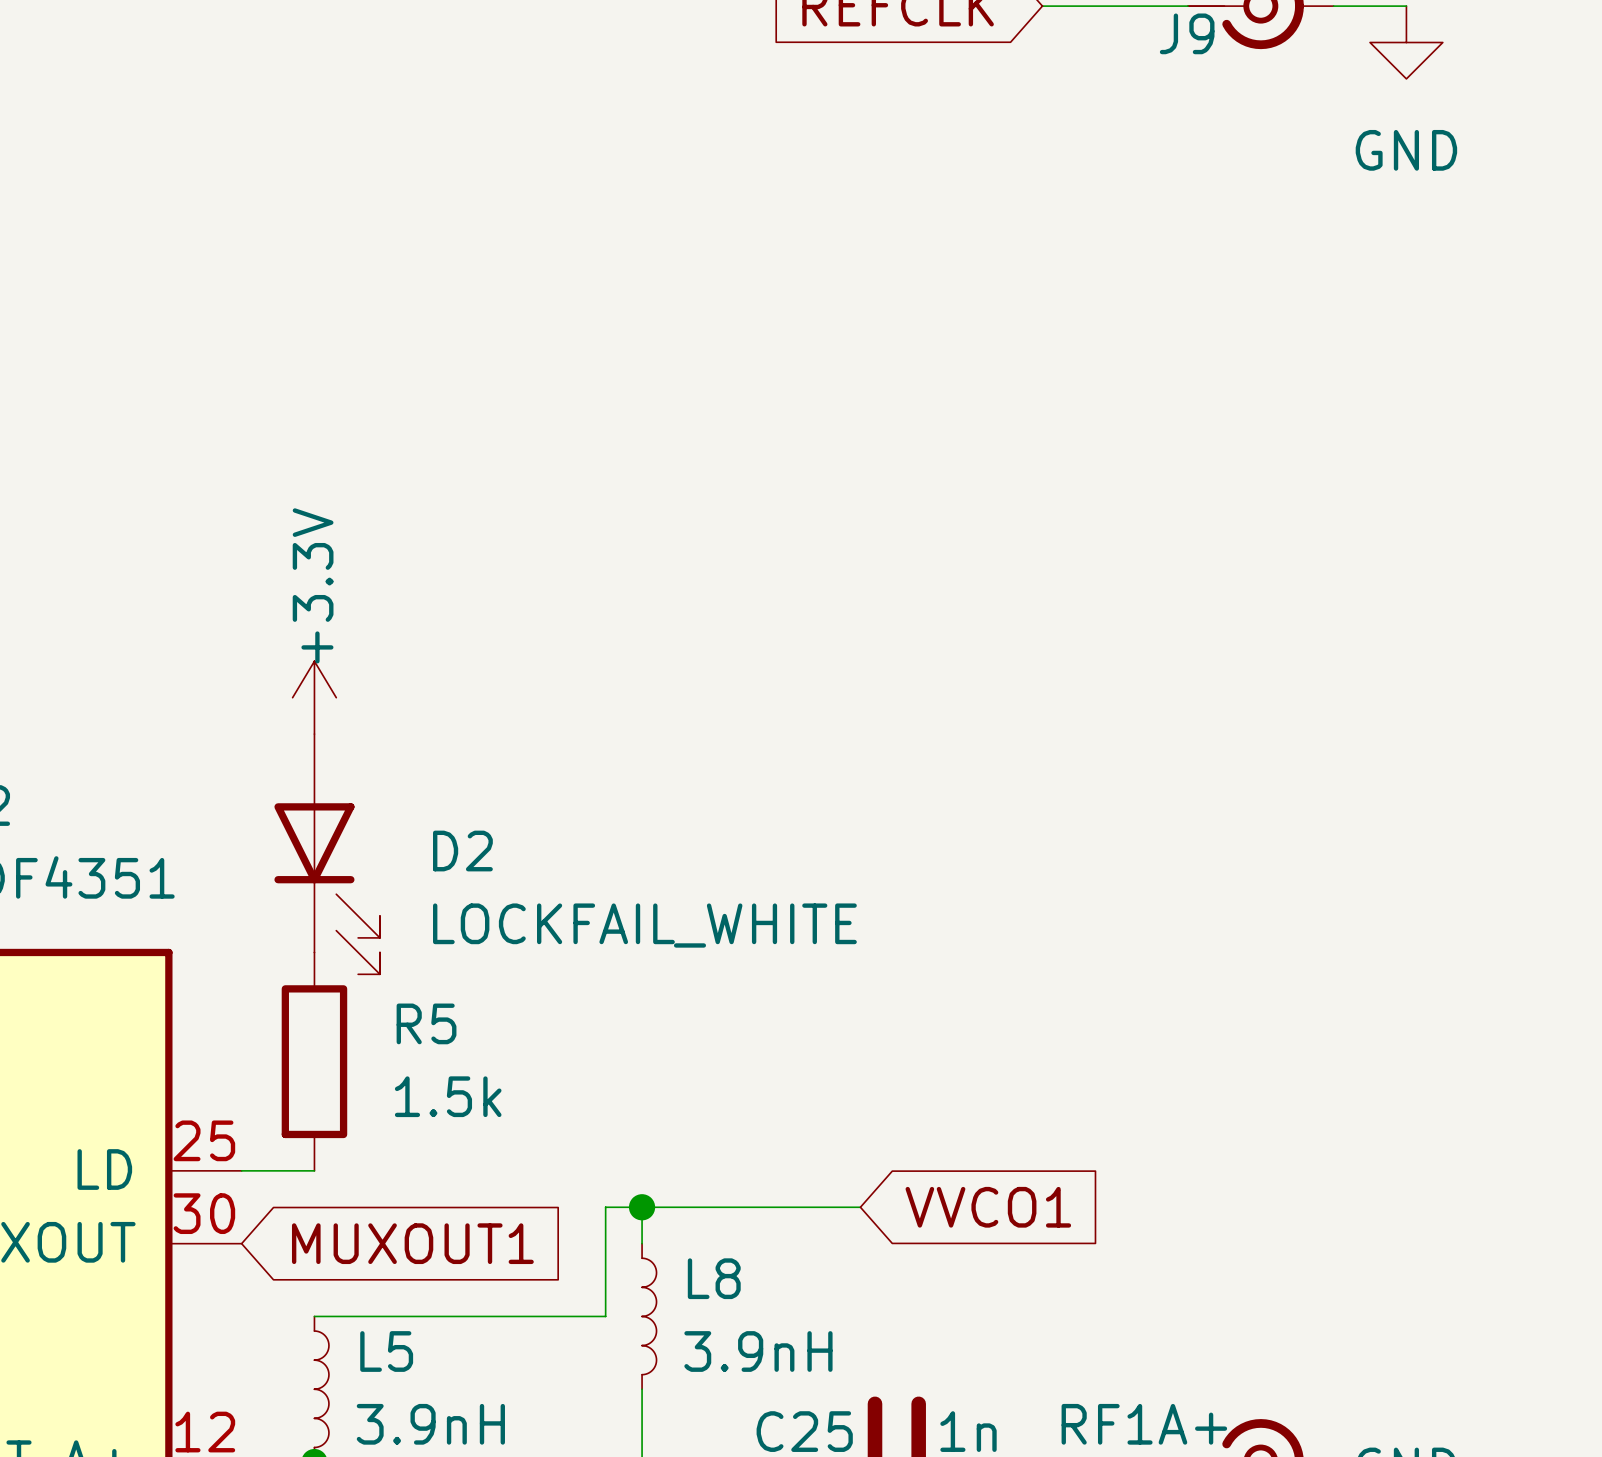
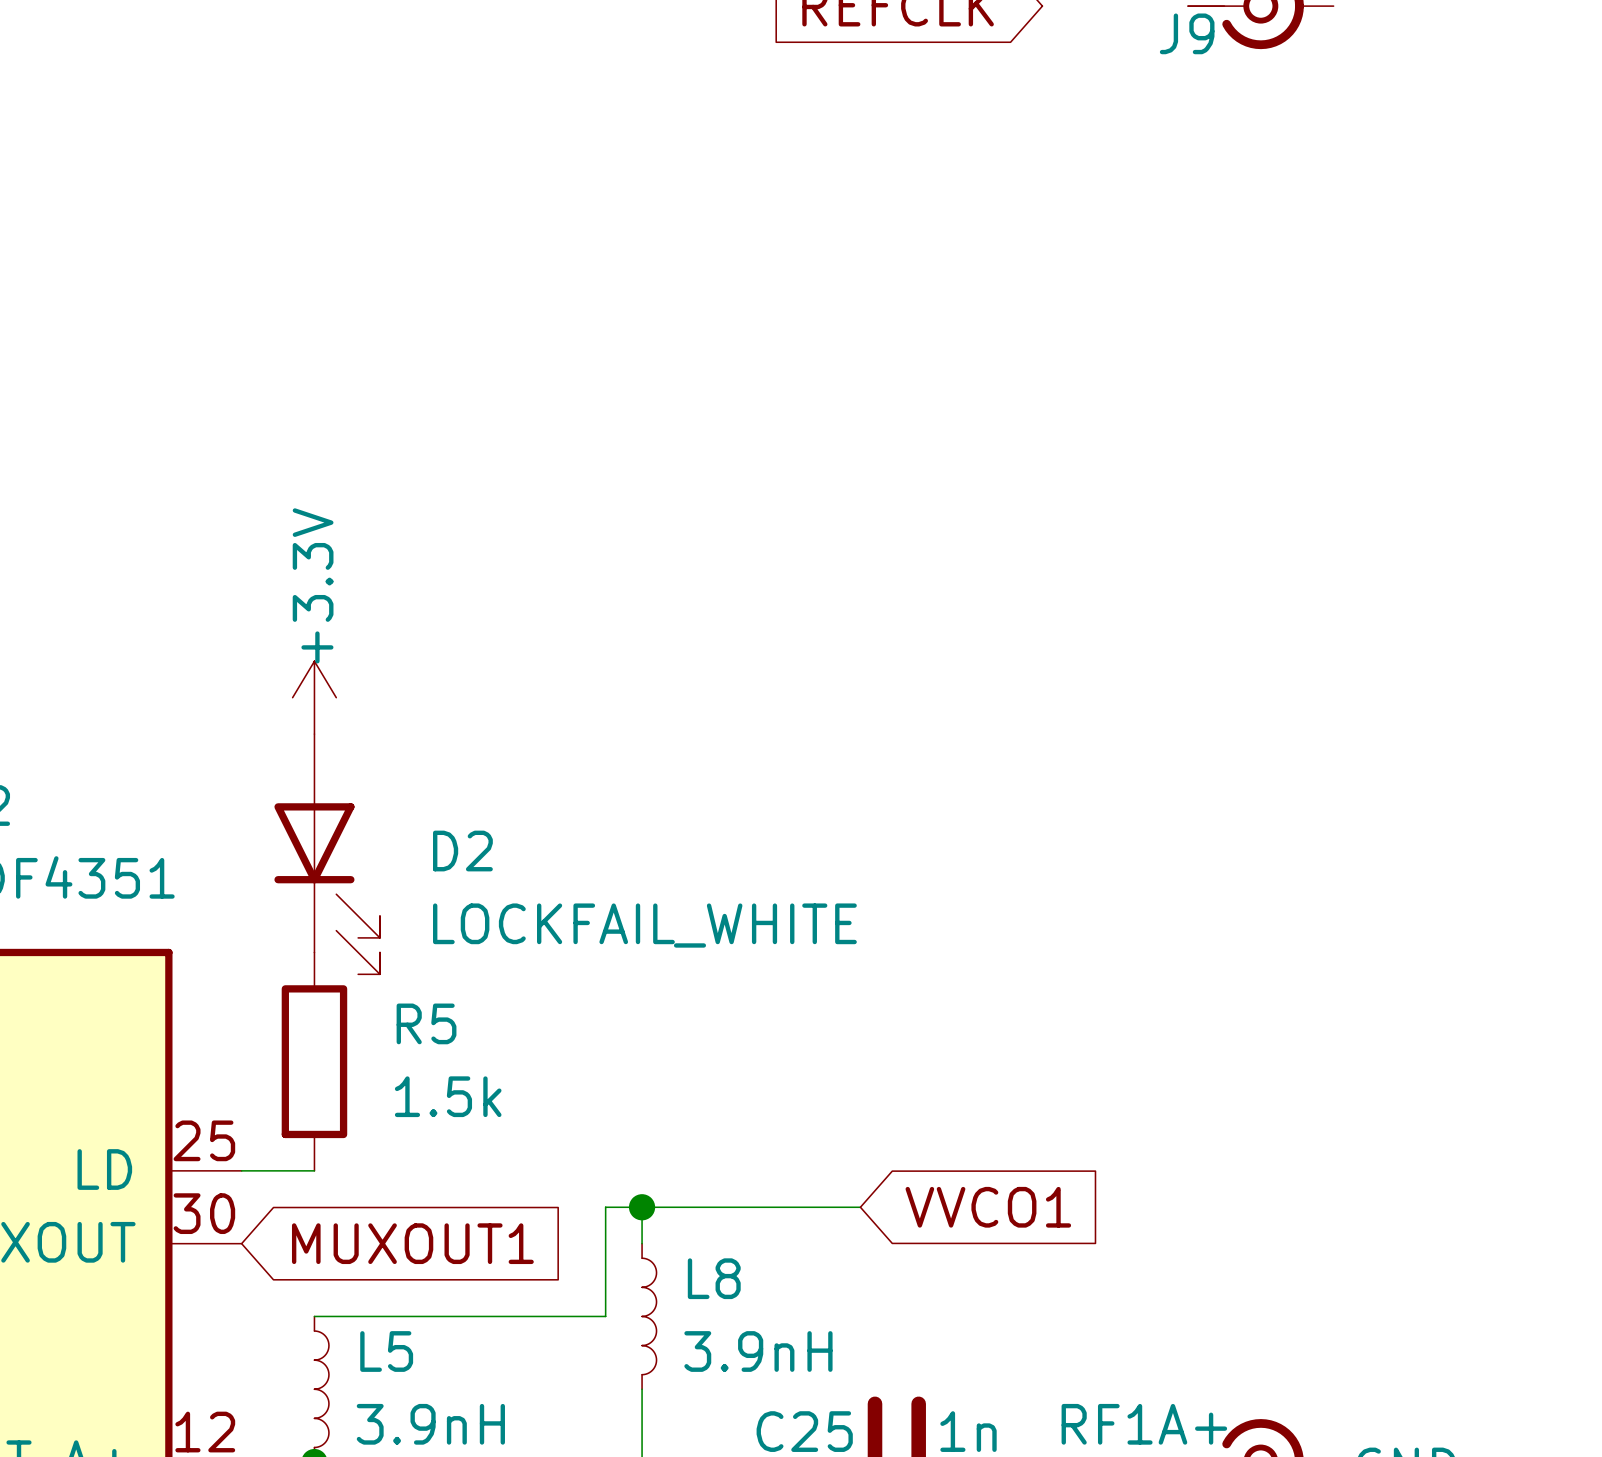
wire: (1042, 6) (1188, 6) -> none
wire: (1333, 6) (1406, 6) -> none
power symbol: GND (1406, 42) -> none

